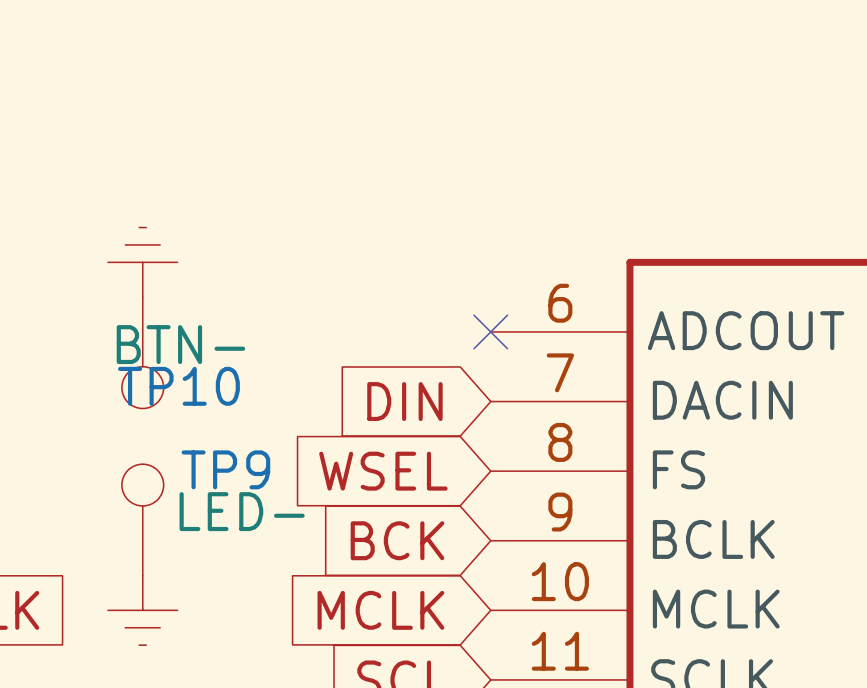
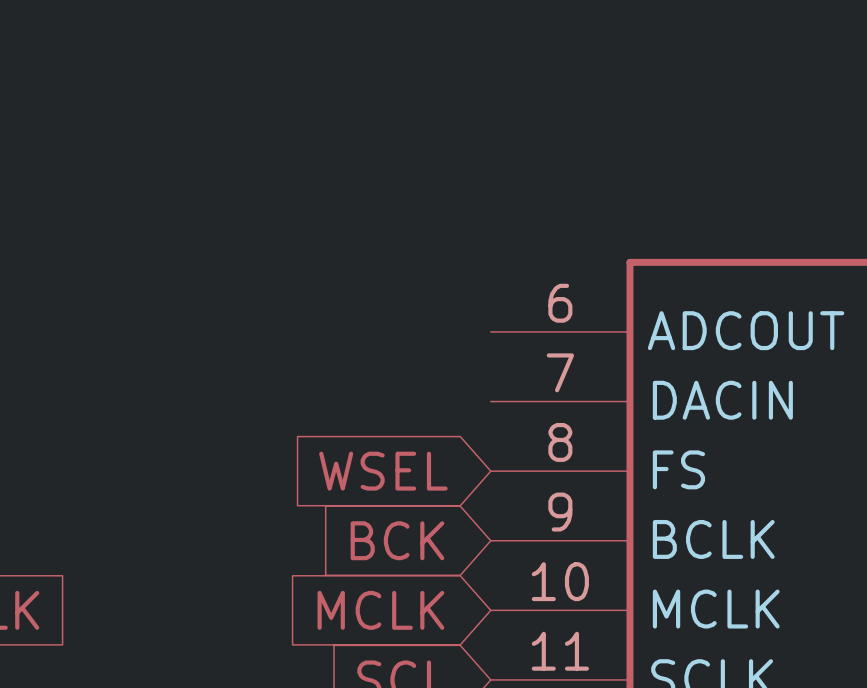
power symbol: (142, 262) -> none
no-connect mark: (490, 331) -> none
TP10: BTN- (142, 352) -> none
global label: DIN (404, 401) -> none
TP9: LED- (142, 519) -> none
power symbol: (142, 610) -> none

